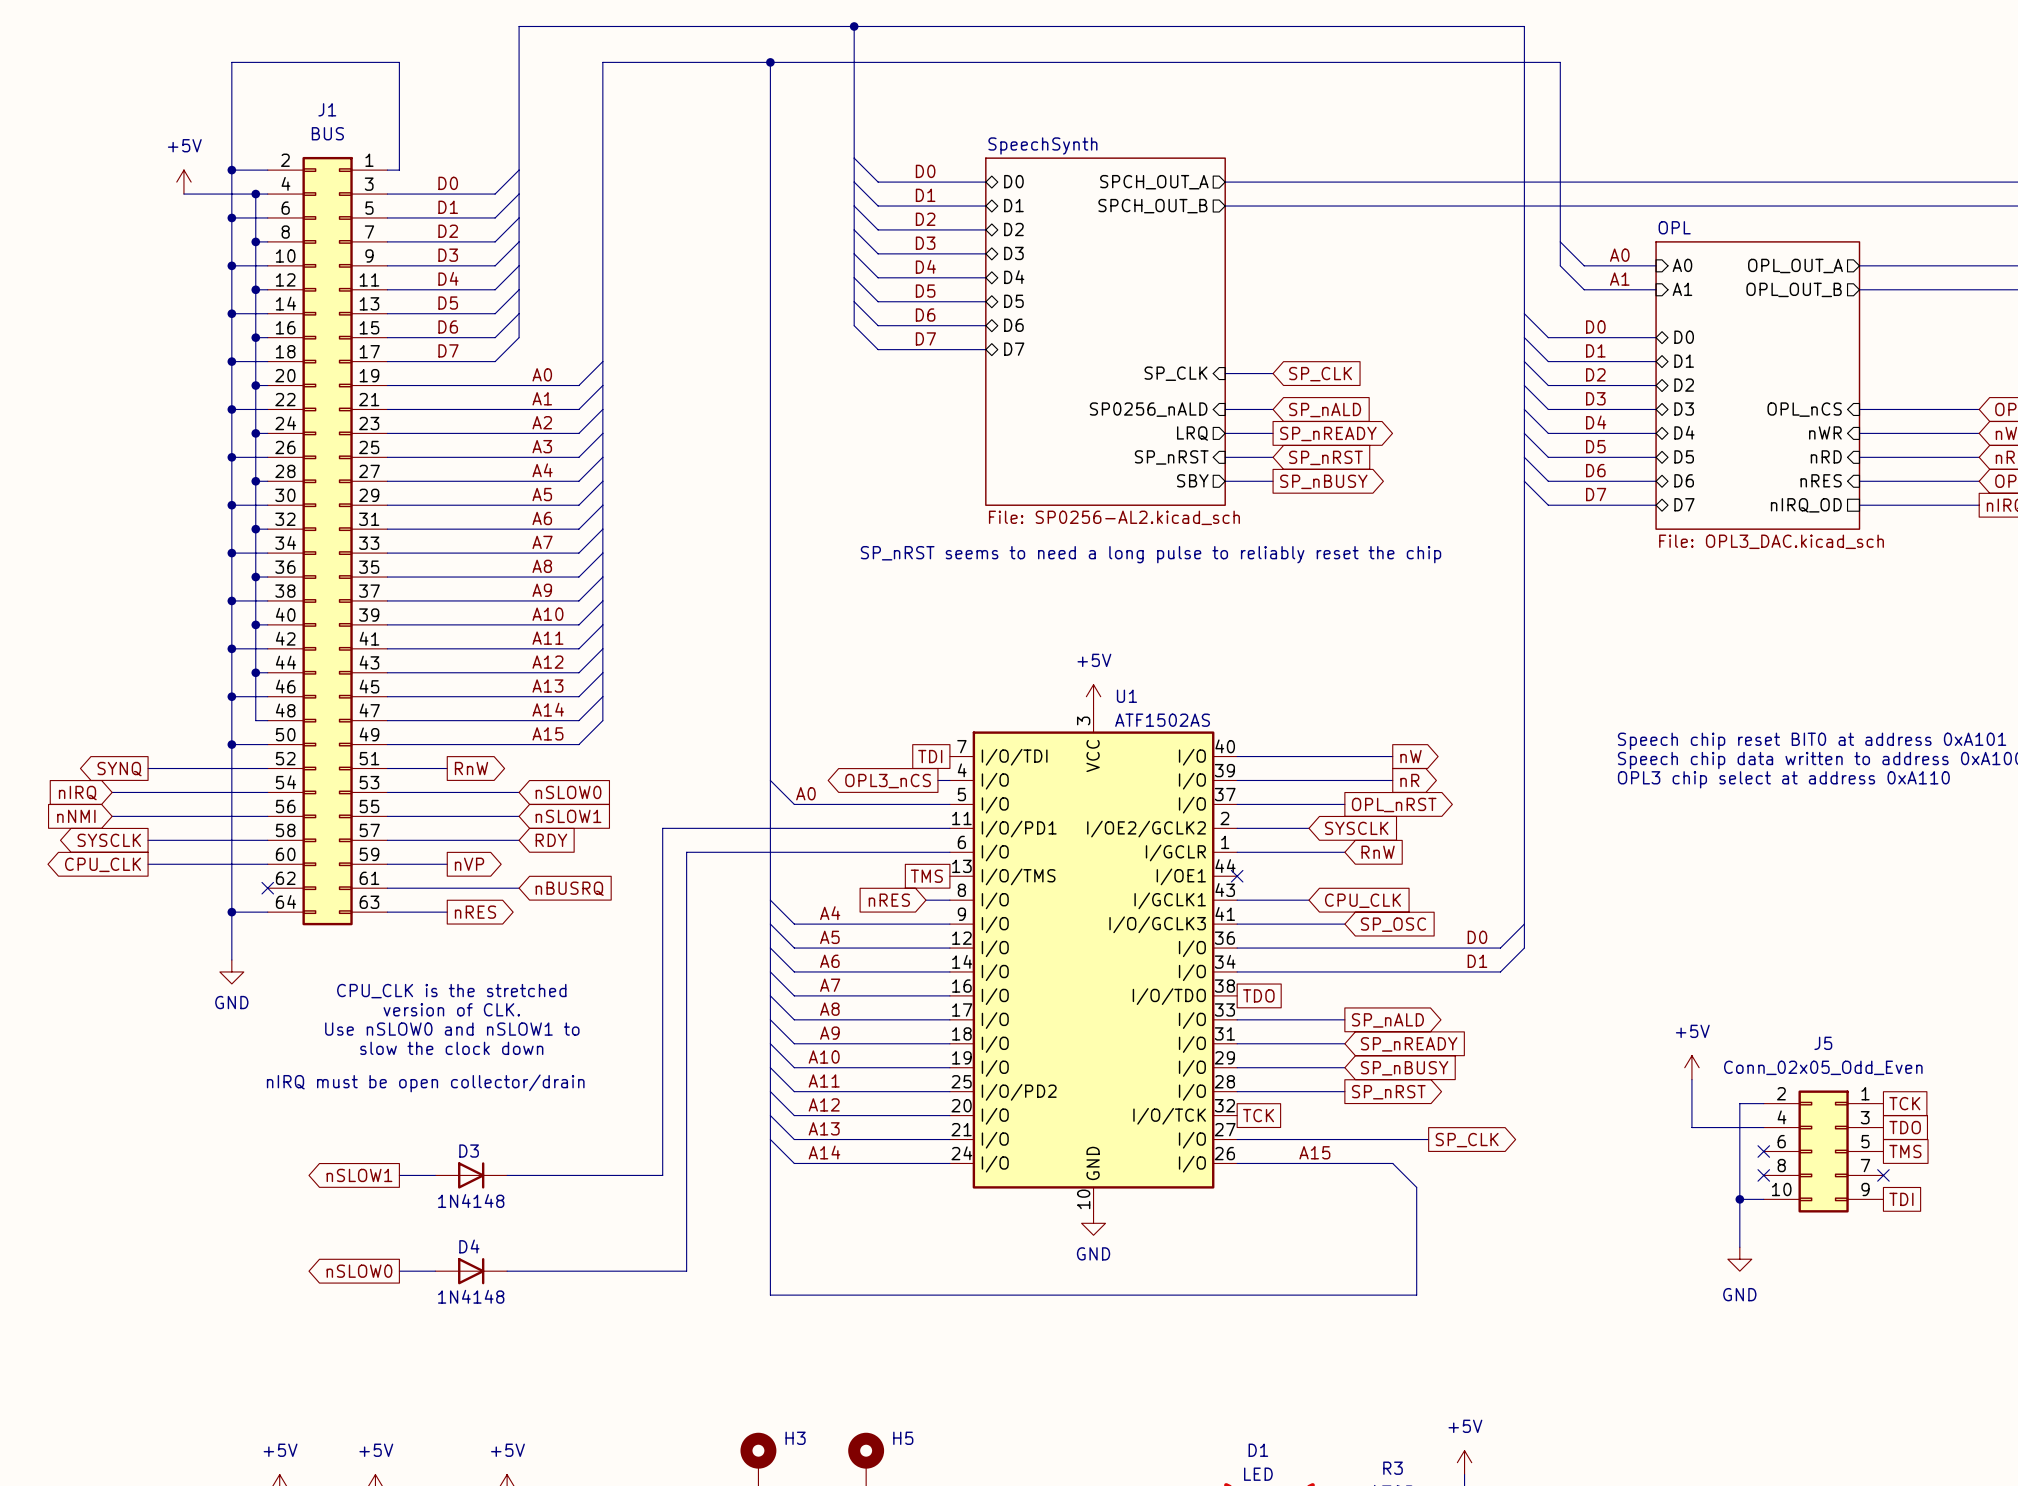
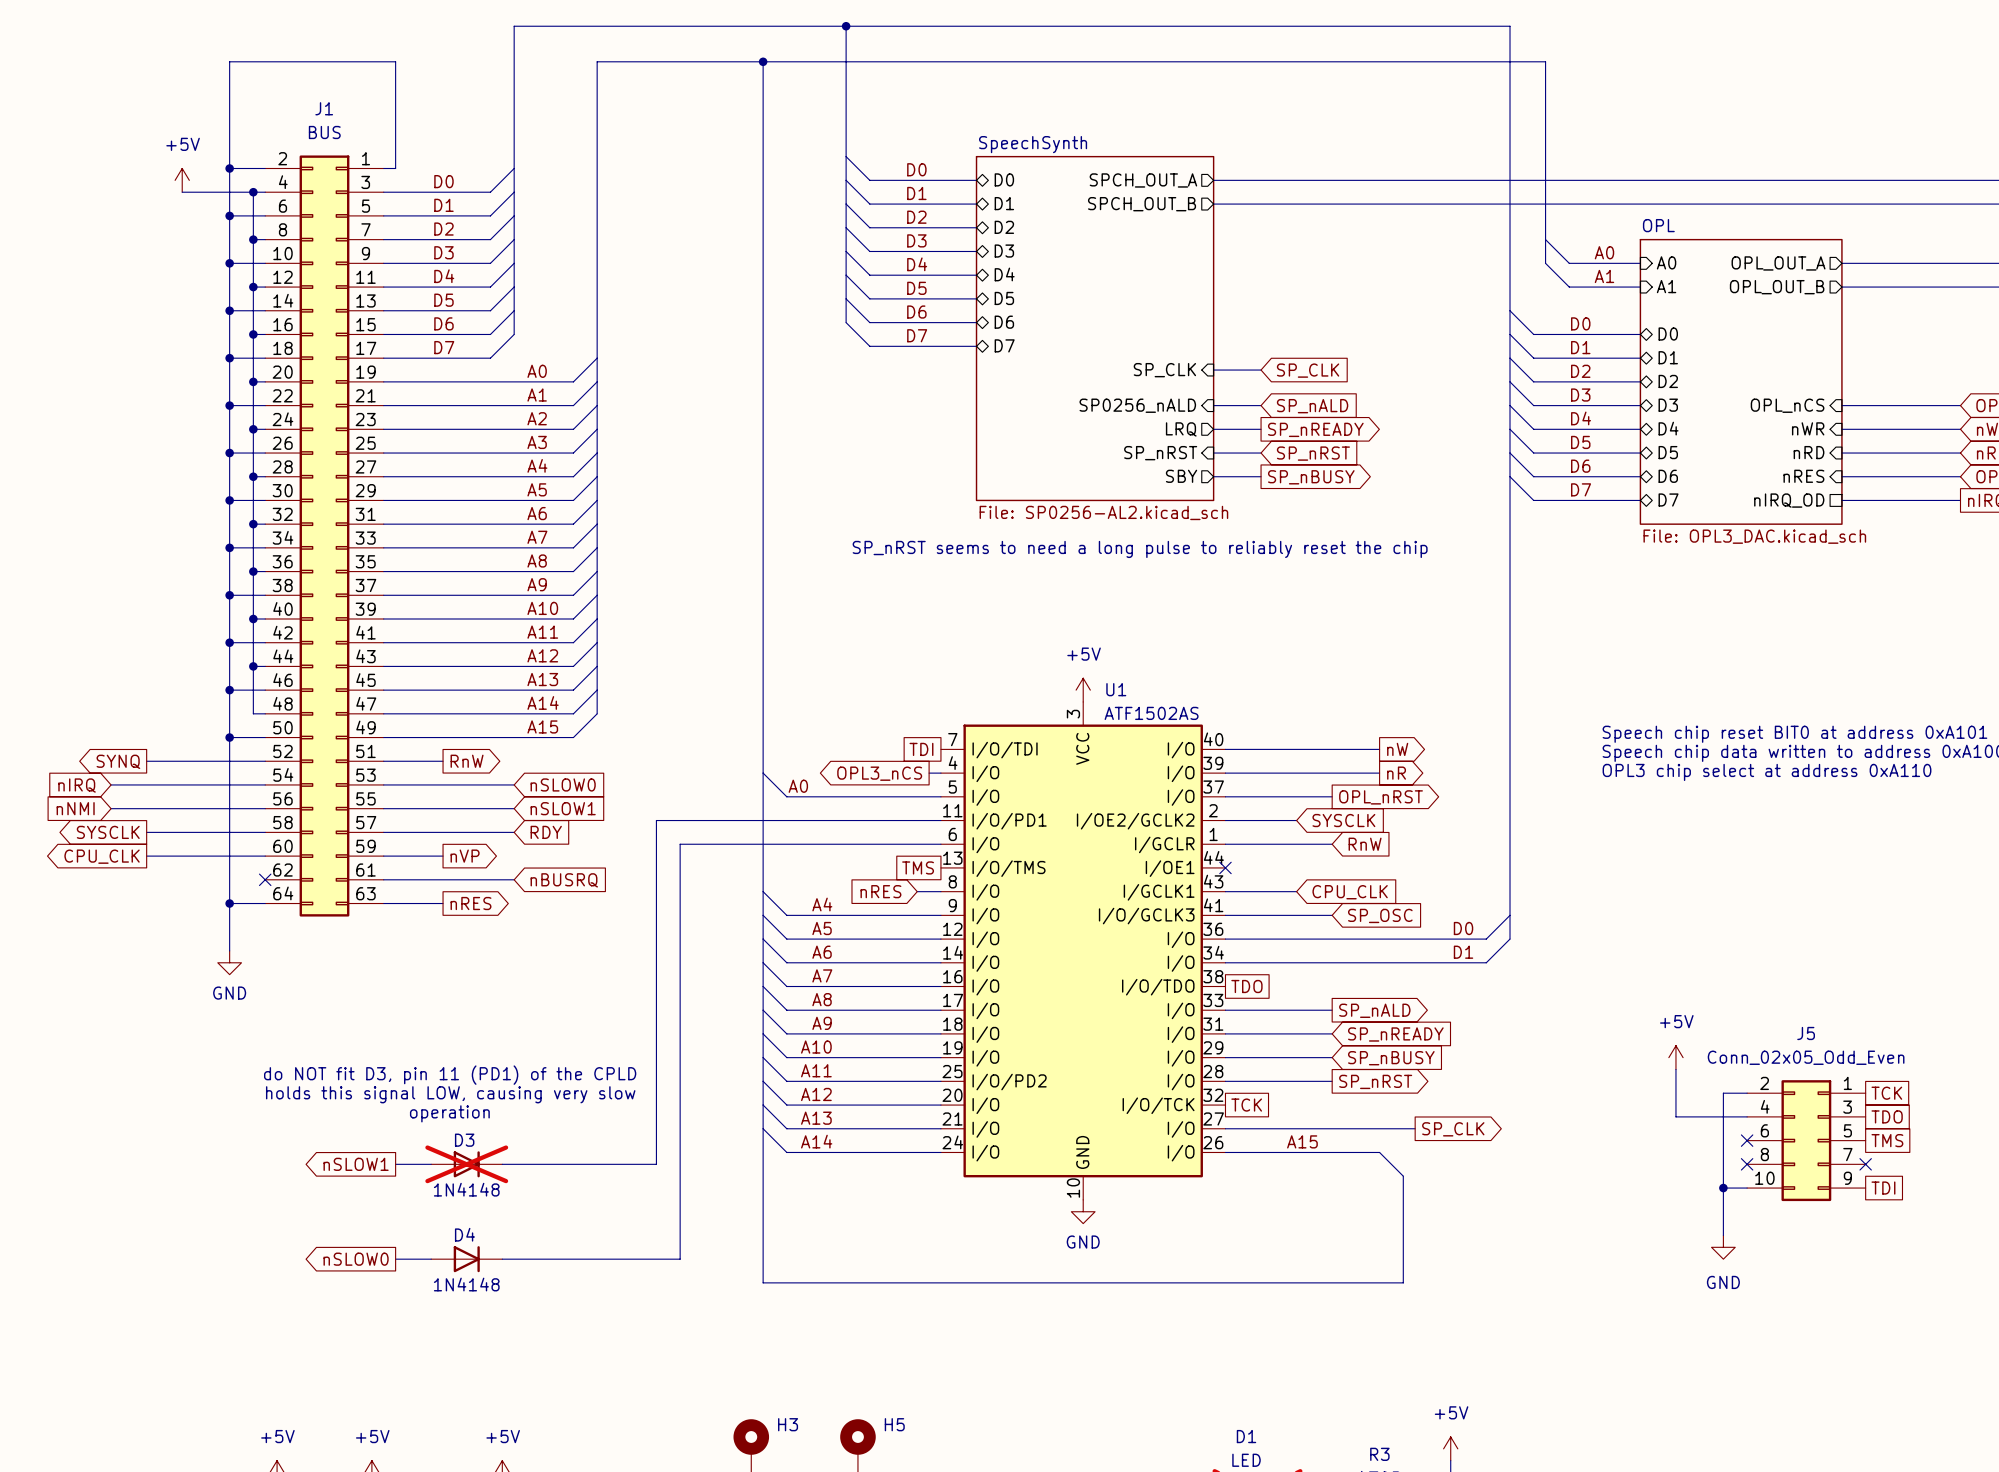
text: CPU_CLK is the stretched (451, 991) -> none
text: version of CLK. (451, 1009) -> none
text: Use nSLOW0 and nSLOW1 to (452, 1029) -> none
text: slow the clock down (451, 1048) -> none
text: nIRQ must be open collector/drain (425, 1083) -> none
text: none -> do NOT fit D3, pin 11 (PD1) of the CPLD (450, 1075)
text: none -> holds this signal LOW, causing very slow (450, 1094)
text: none -> operation (449, 1113)
D3 do-not-place cross: none -> (466, 1164)

